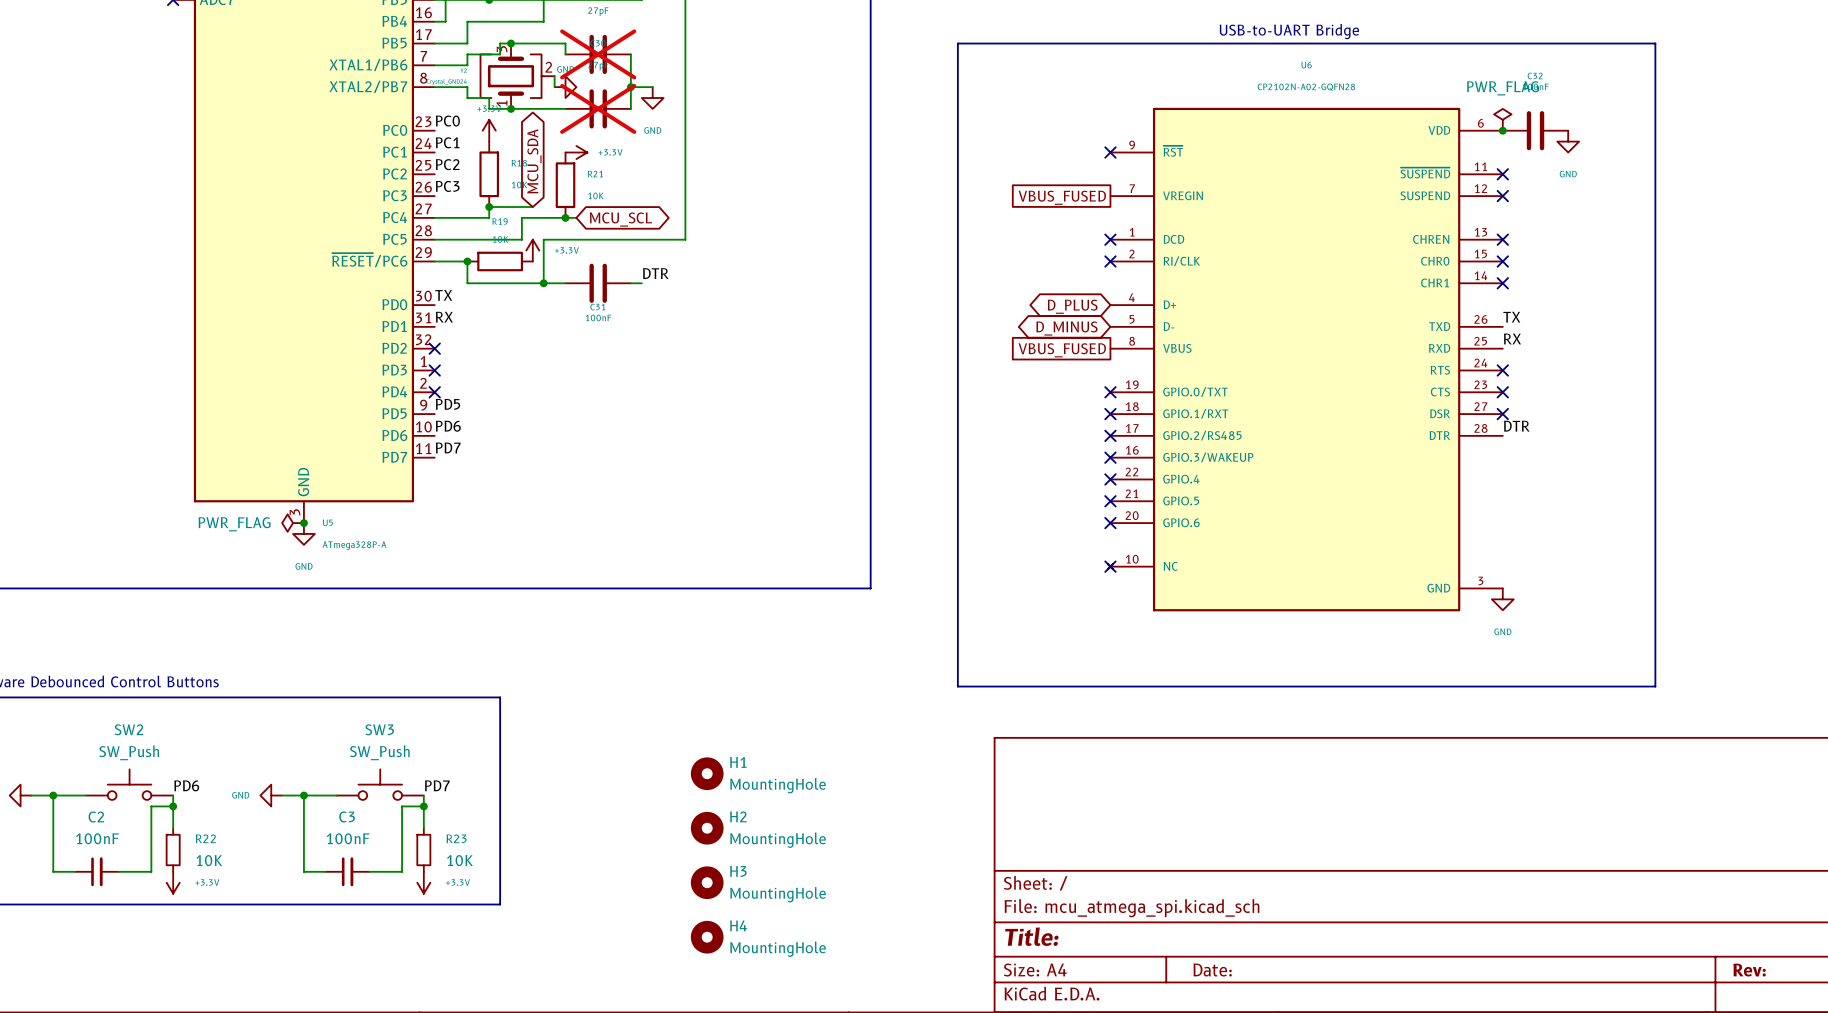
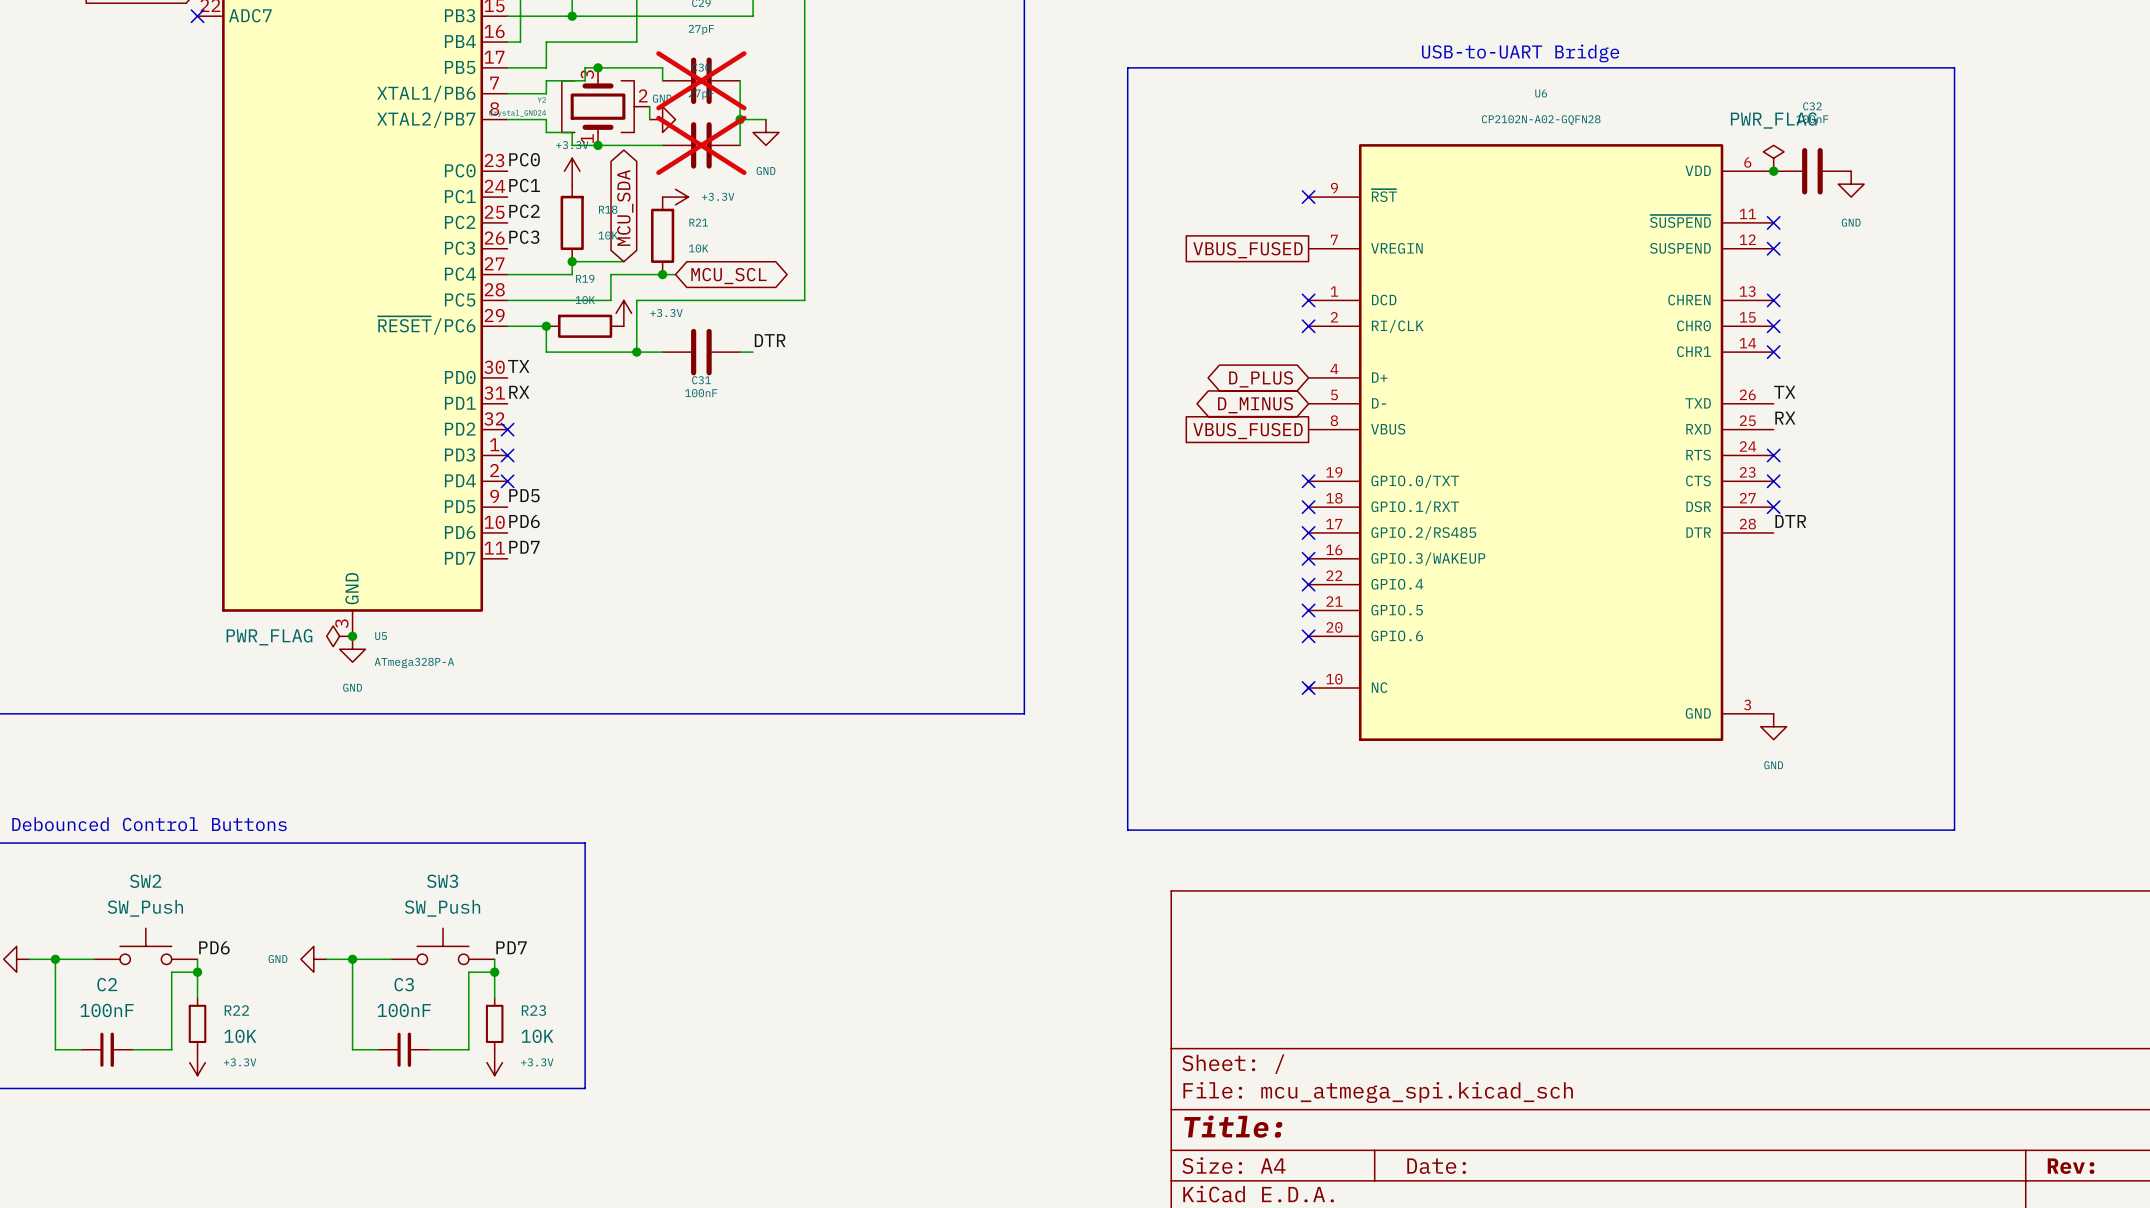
H1: MountingHole (707, 773) -> none
H2: MountingHole (707, 828) -> none
H3: MountingHole (707, 882) -> none
H4: MountingHole (707, 937) -> none

